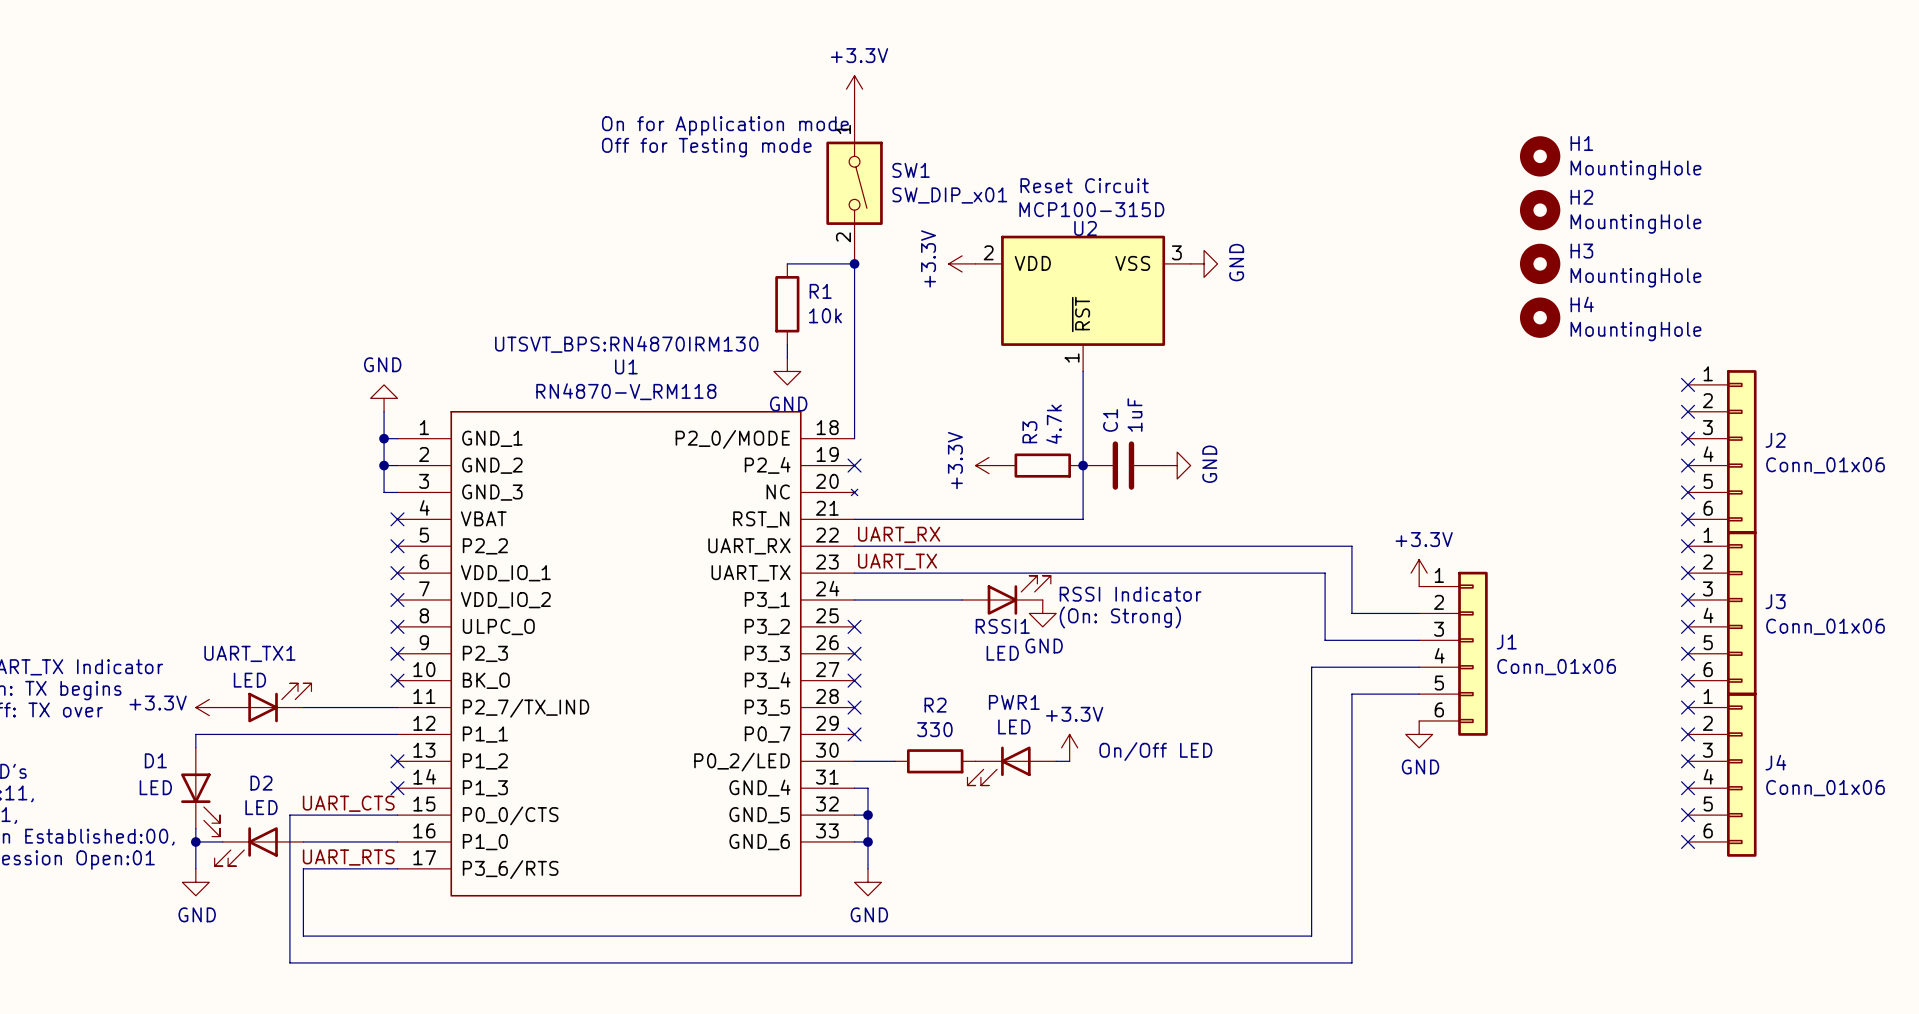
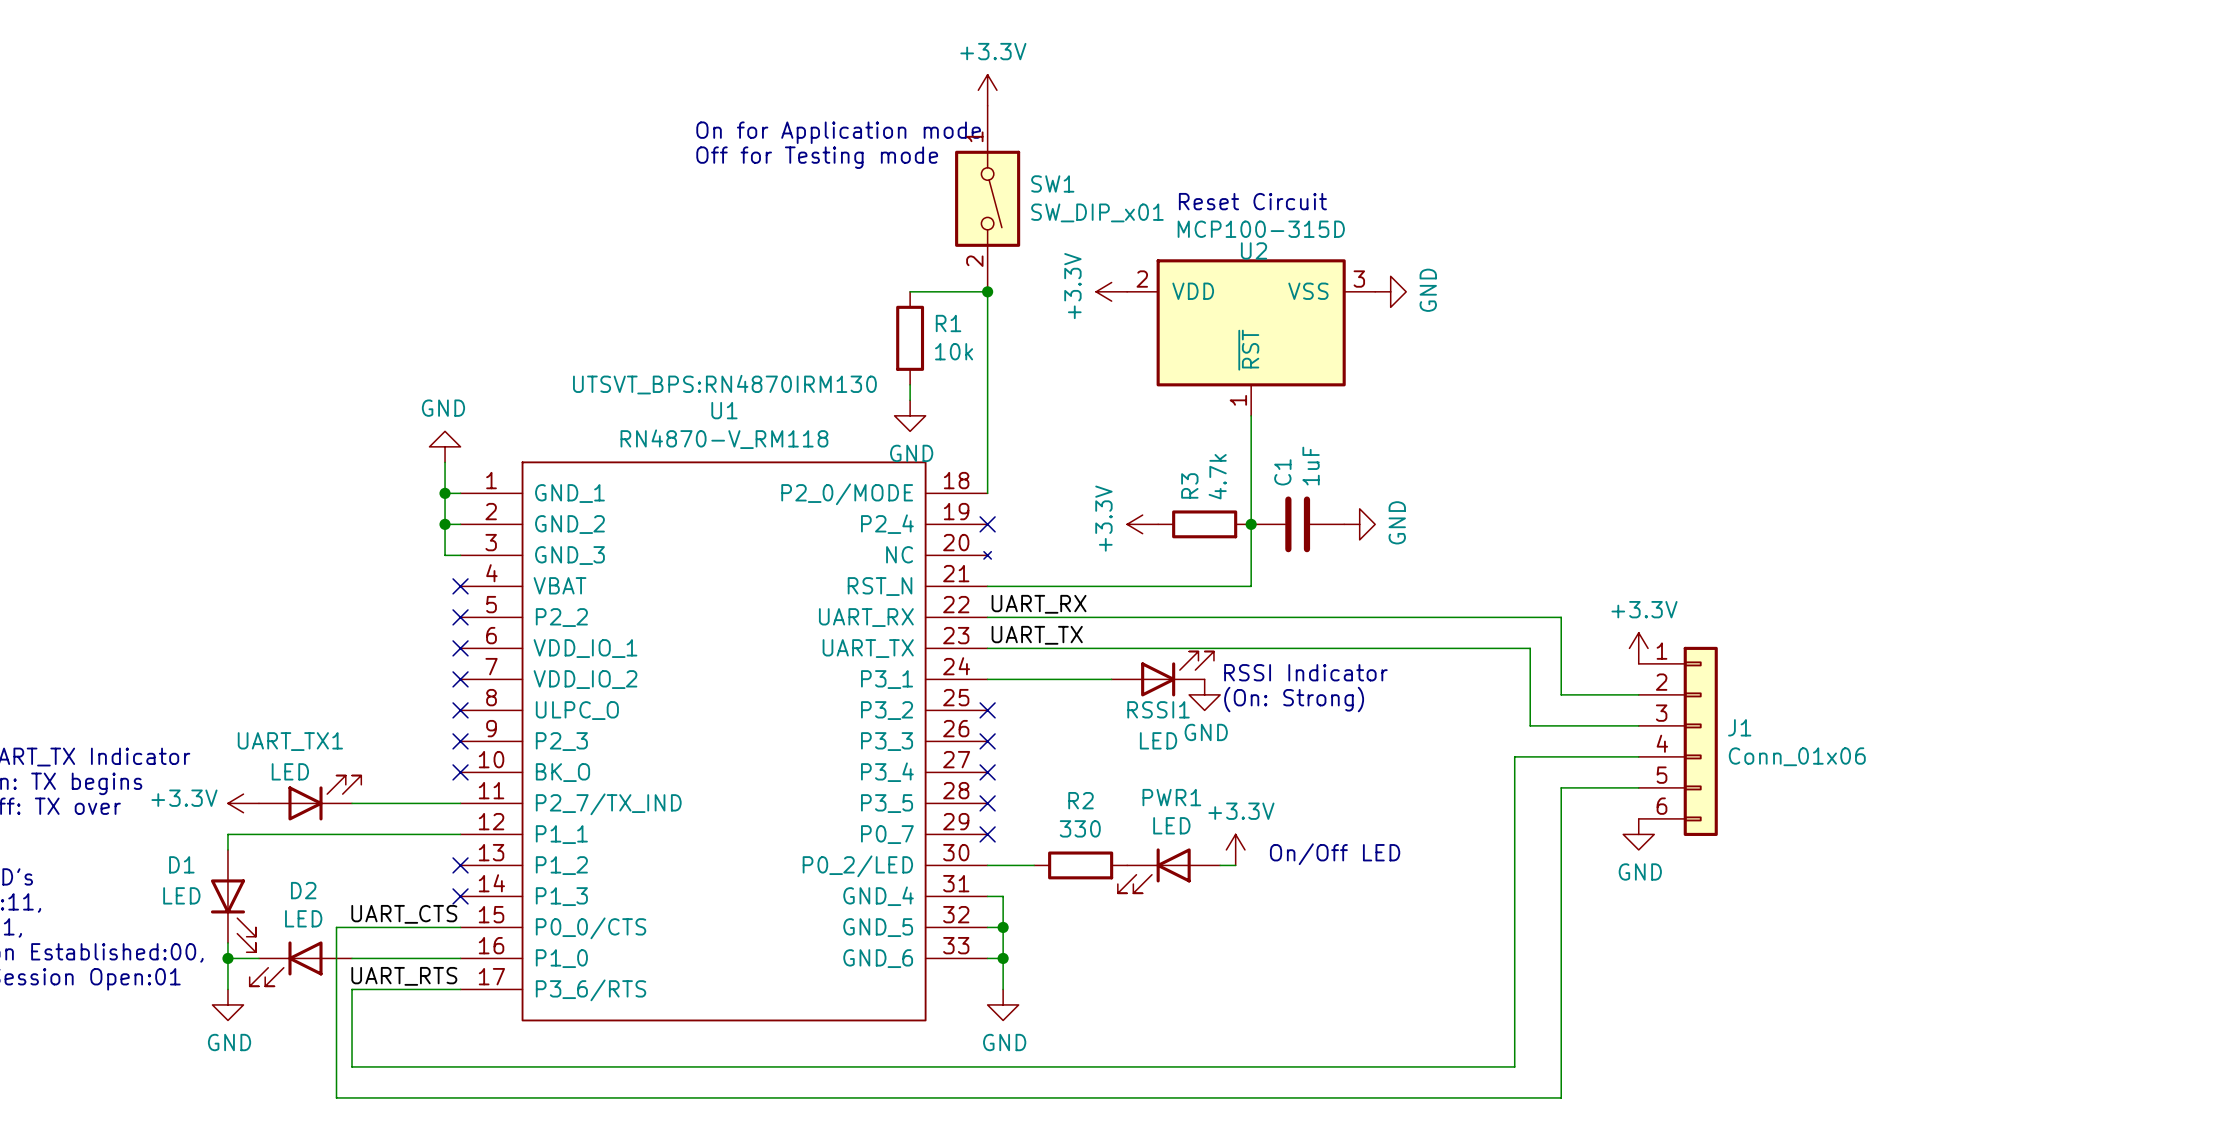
H1: MountingHole (1540, 156) -> none
H2: MountingHole (1540, 210) -> none
H3: MountingHole (1540, 263) -> none
H4: MountingHole (1540, 317) -> none
no-connect mark: (1688, 384) -> none
no-connect mark: (1688, 411) -> none
no-connect mark: (1688, 438) -> none
J2: Conn_01x06 (1722, 452) -> none
no-connect mark: (1688, 465) -> none
no-connect mark: (1688, 492) -> none
no-connect mark: (1688, 519) -> none
no-connect mark: (1688, 546) -> none
no-connect mark: (1688, 573) -> none
no-connect mark: (1688, 600) -> none
J3: Conn_01x06 (1722, 613) -> none
no-connect mark: (1688, 626) -> none
no-connect mark: (1688, 653) -> none
no-connect mark: (1688, 680) -> none
no-connect mark: (1688, 707) -> none
no-connect mark: (1688, 734) -> none
no-connect mark: (1688, 761) -> none
J4: Conn_01x06 (1722, 774) -> none
no-connect mark: (1688, 788) -> none
no-connect mark: (1688, 815) -> none
no-connect mark: (1688, 841) -> none

